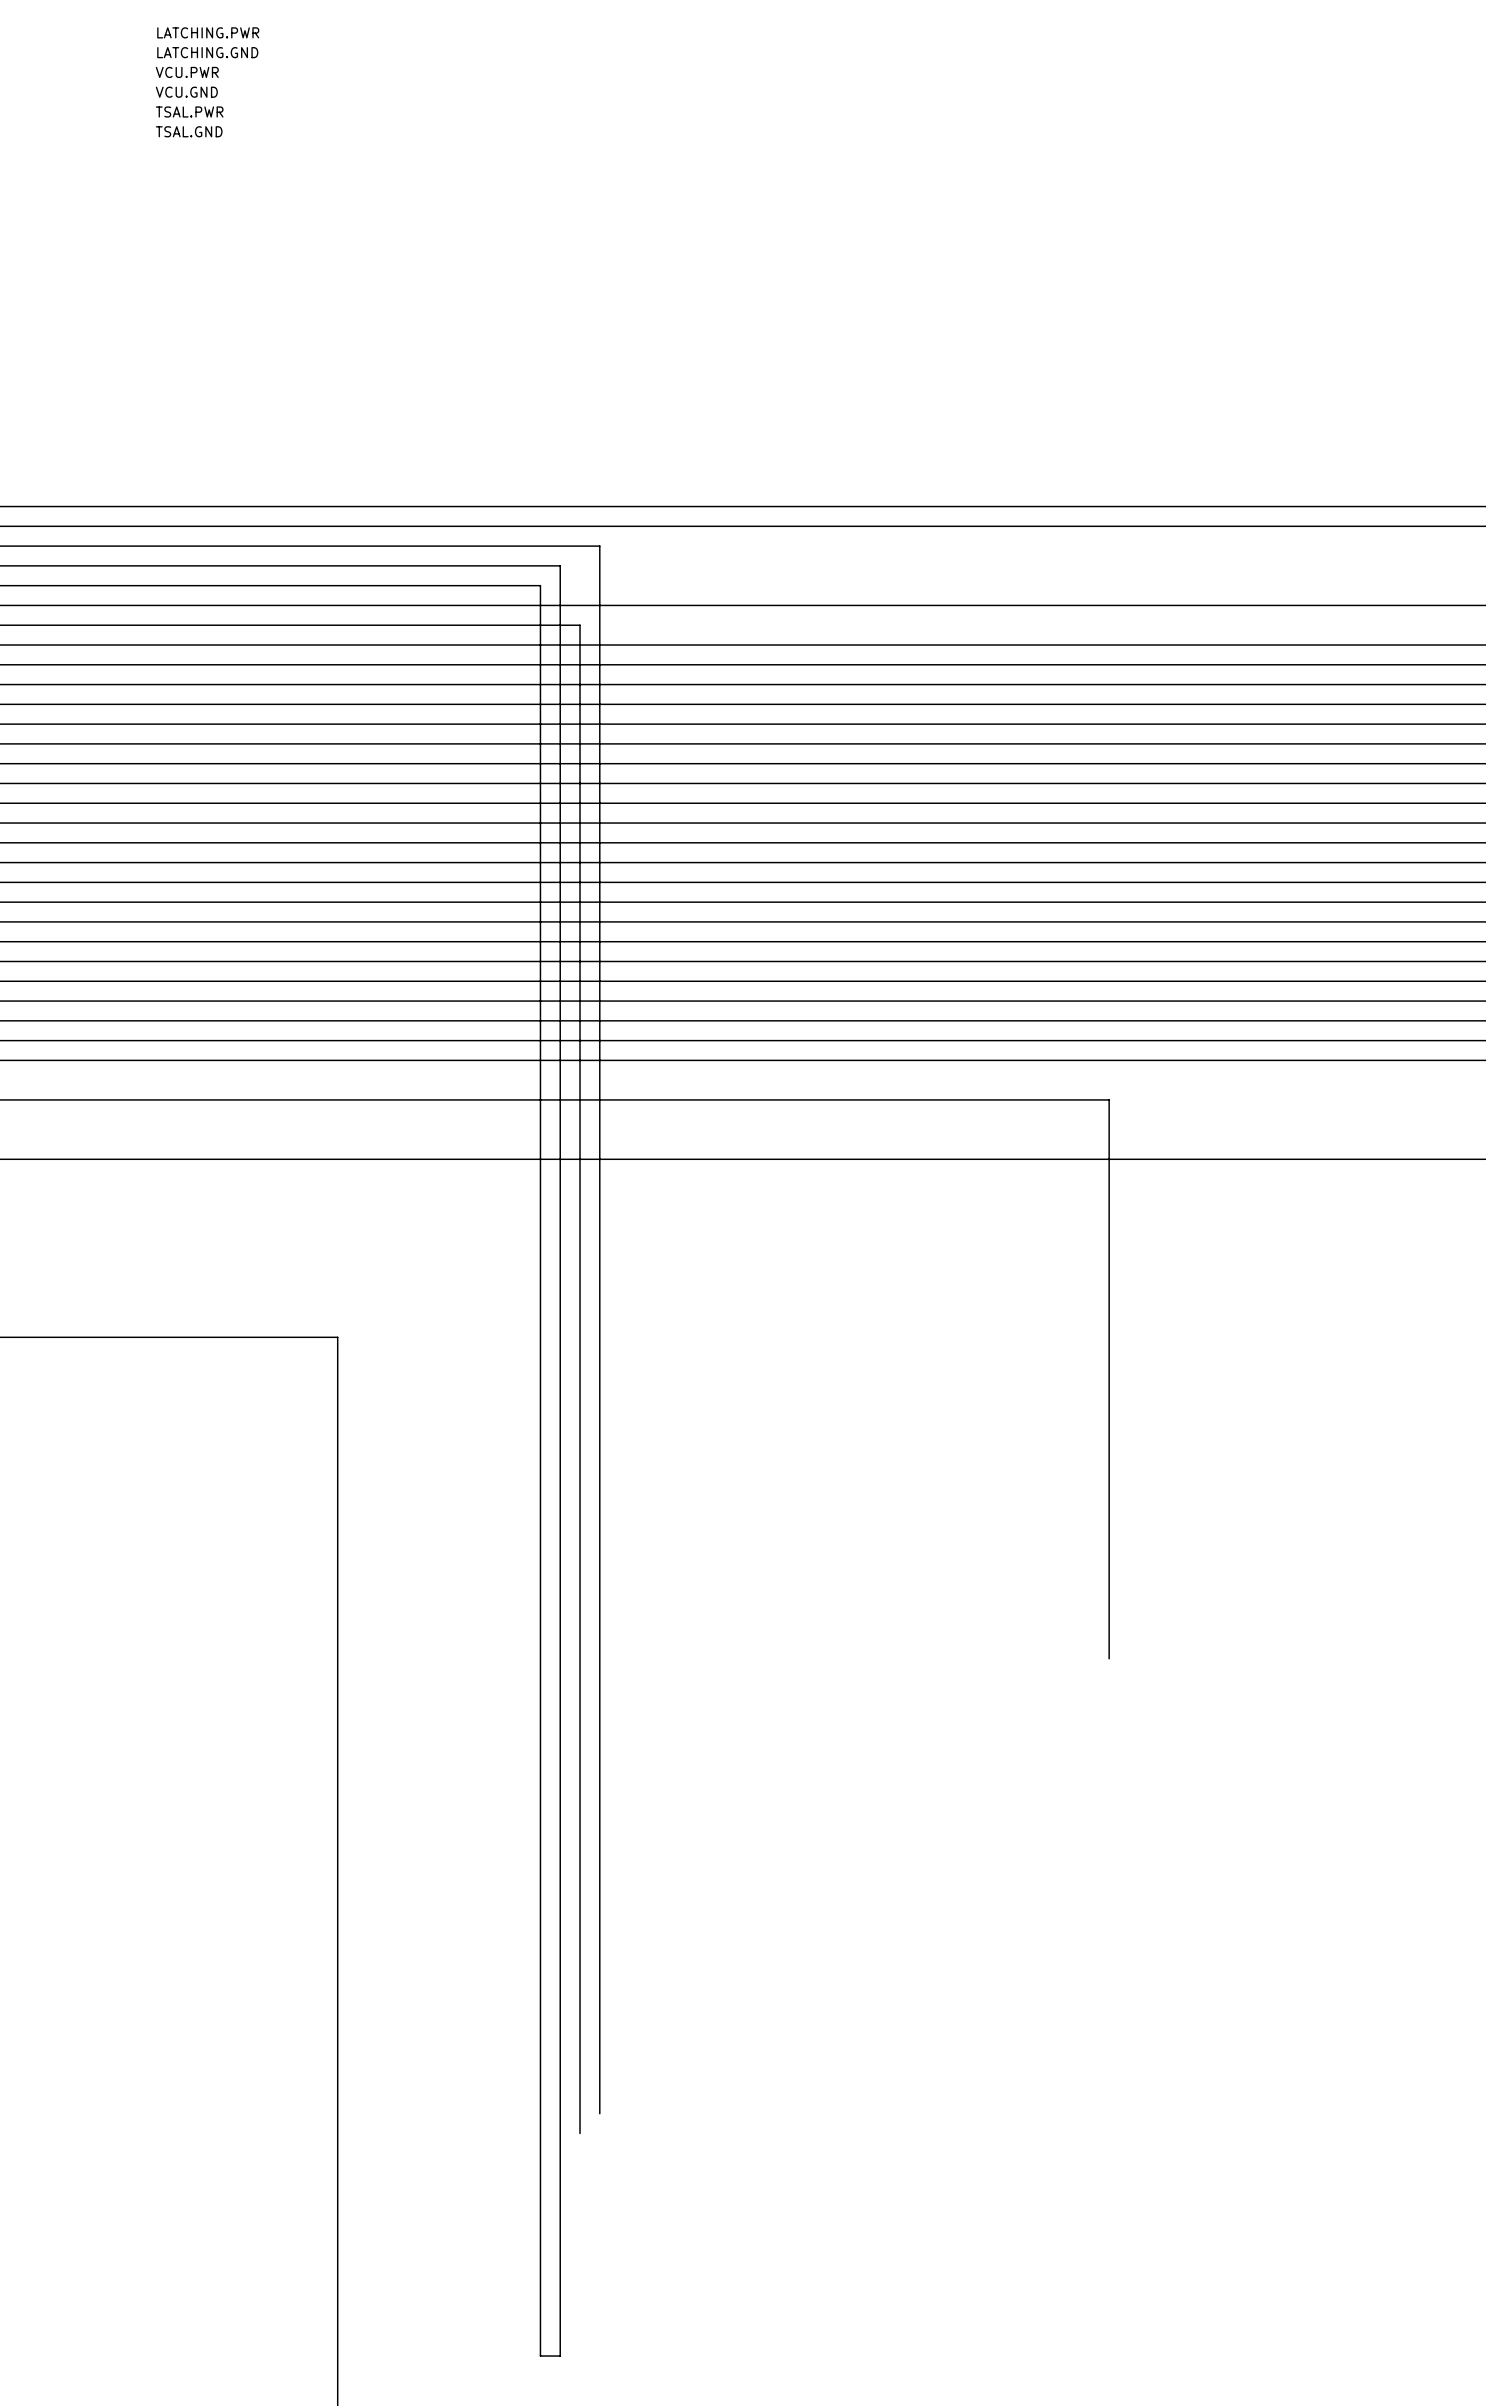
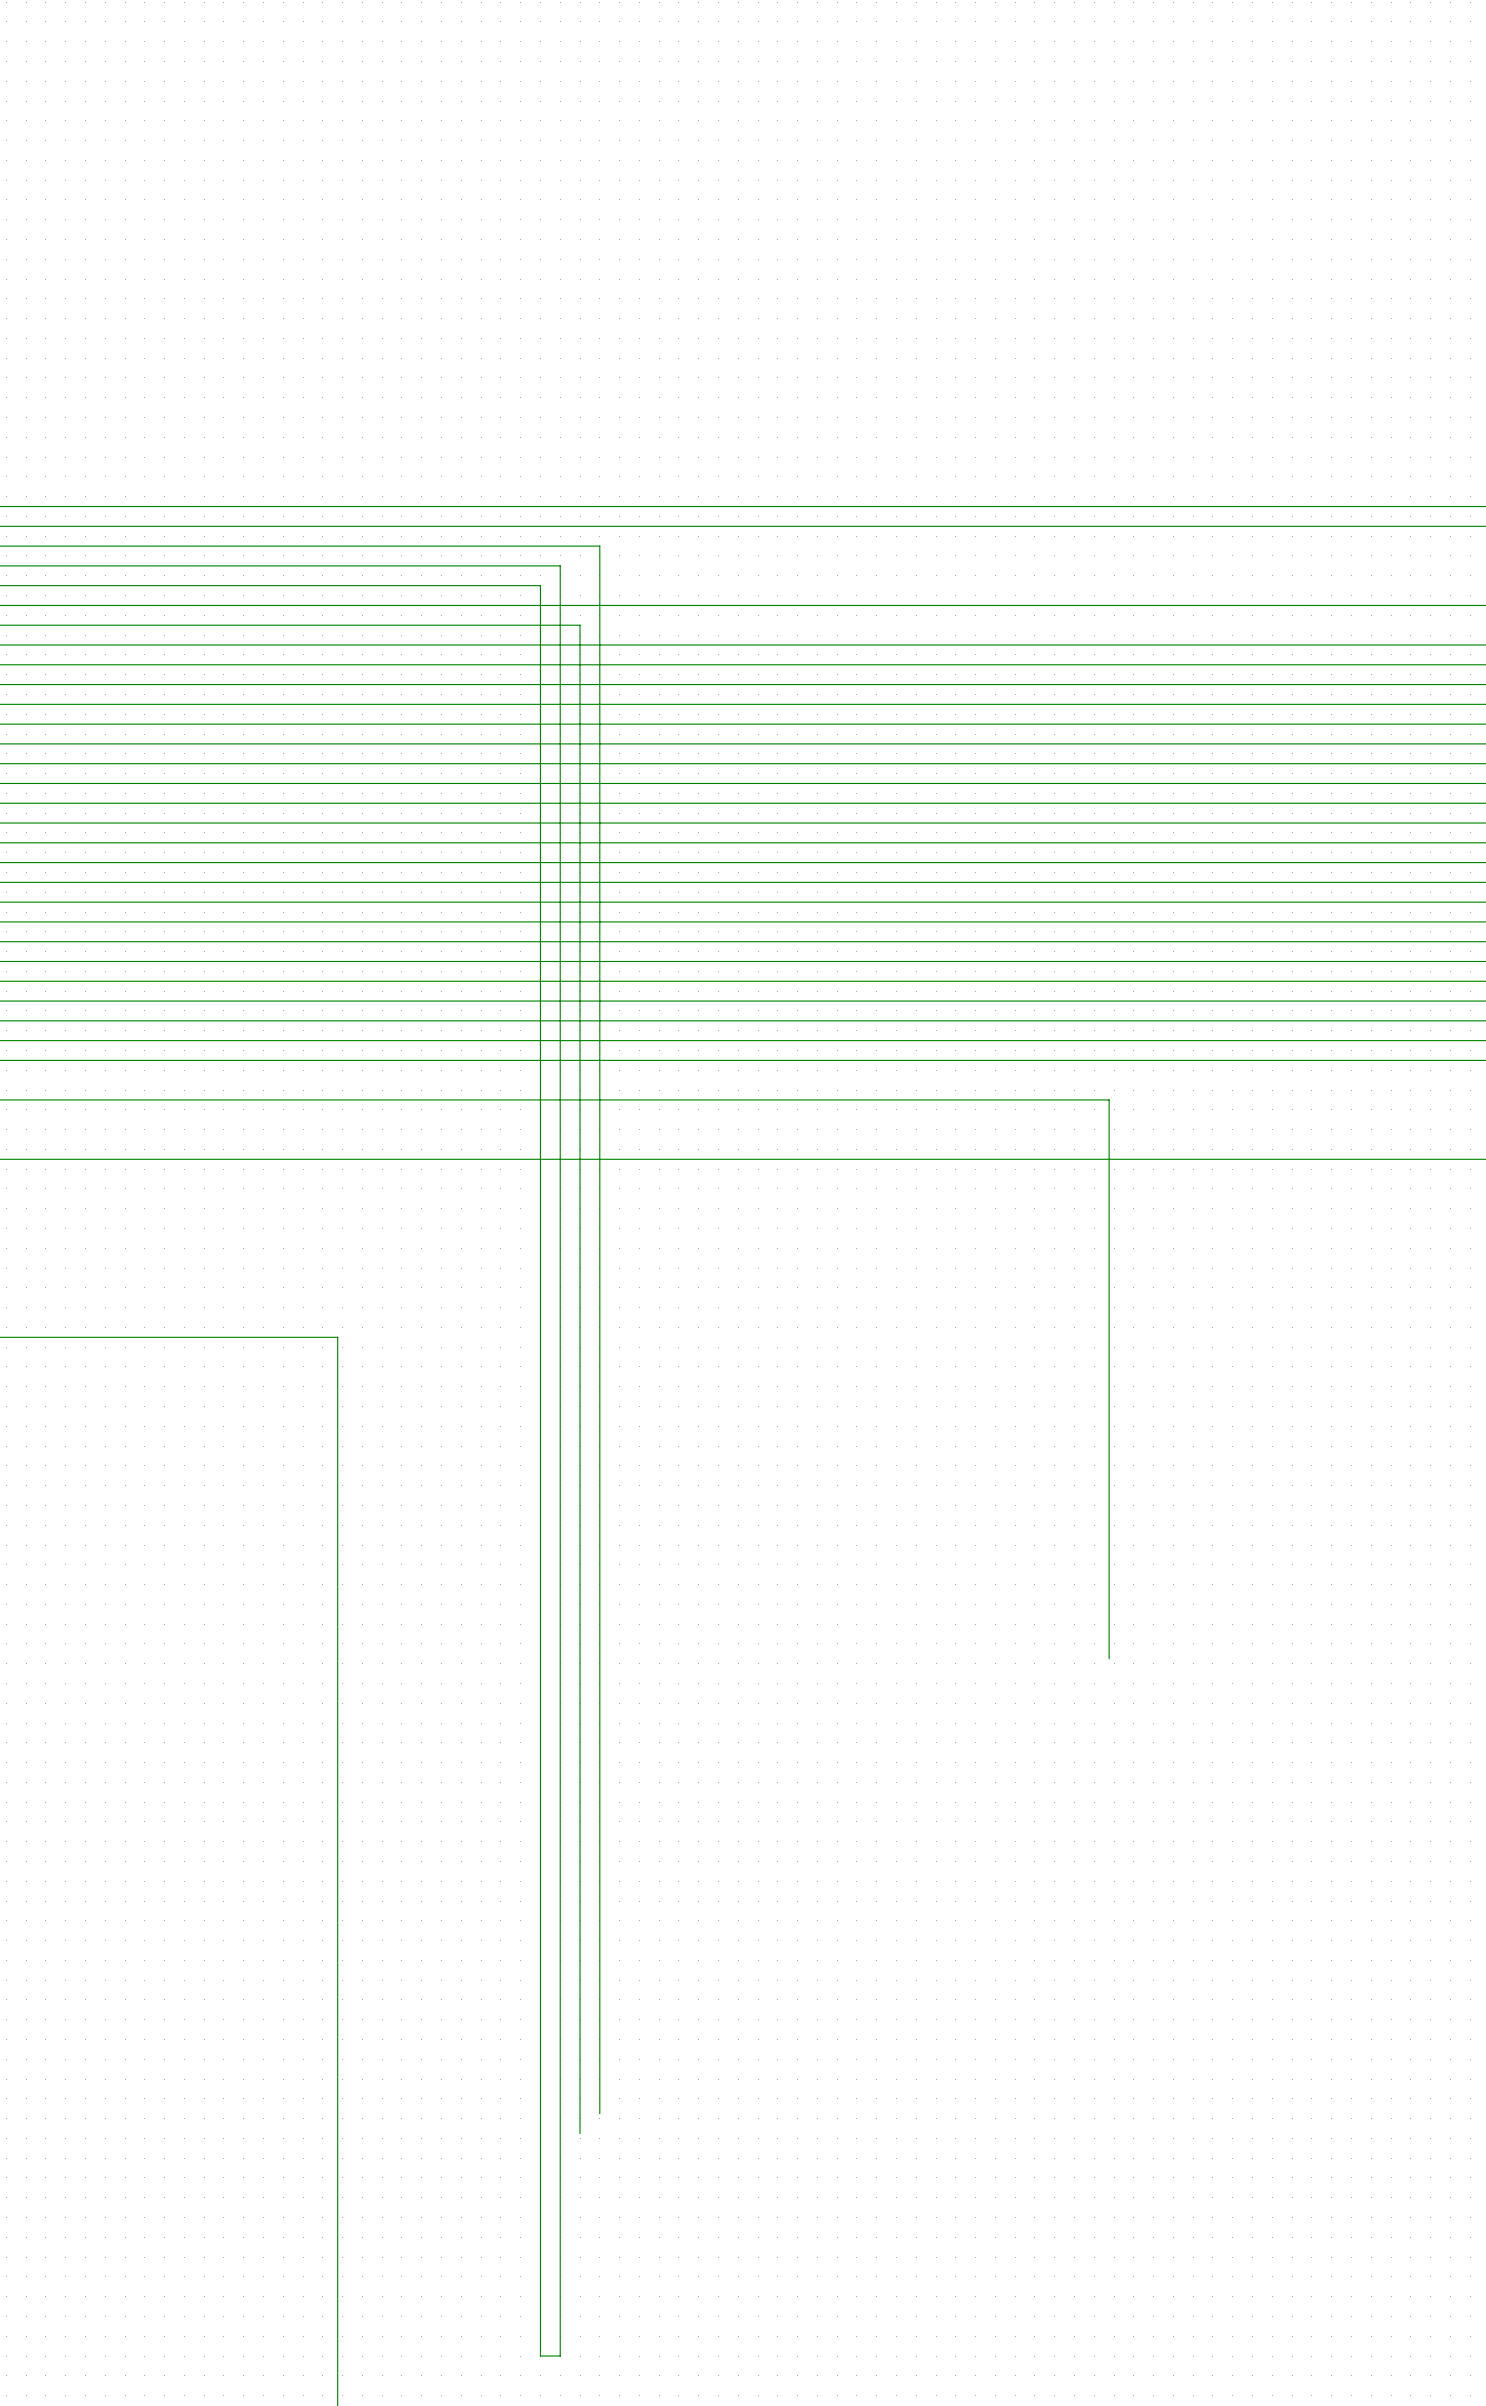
label: LATCHING.PWR (208, 32) -> none
label: LATCHING.GND (207, 52) -> none
label: VCU.PWR (187, 72) -> none
label: VCU.GND (186, 92) -> none
label: TSAL.PWR (189, 111) -> none
label: TSAL.GND (189, 131) -> none

